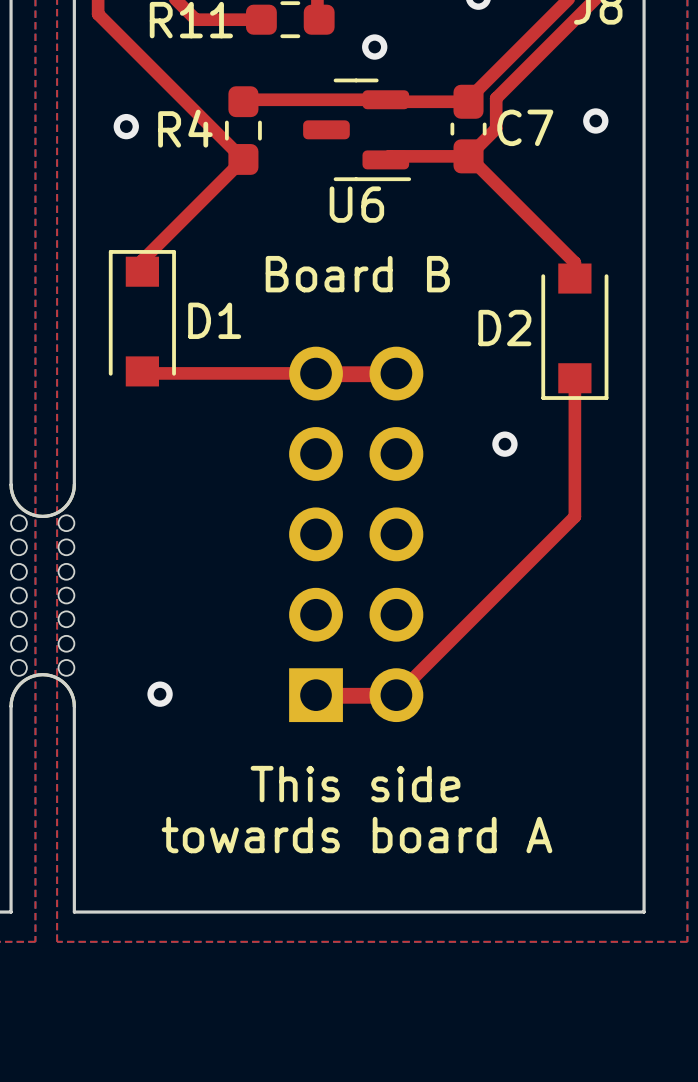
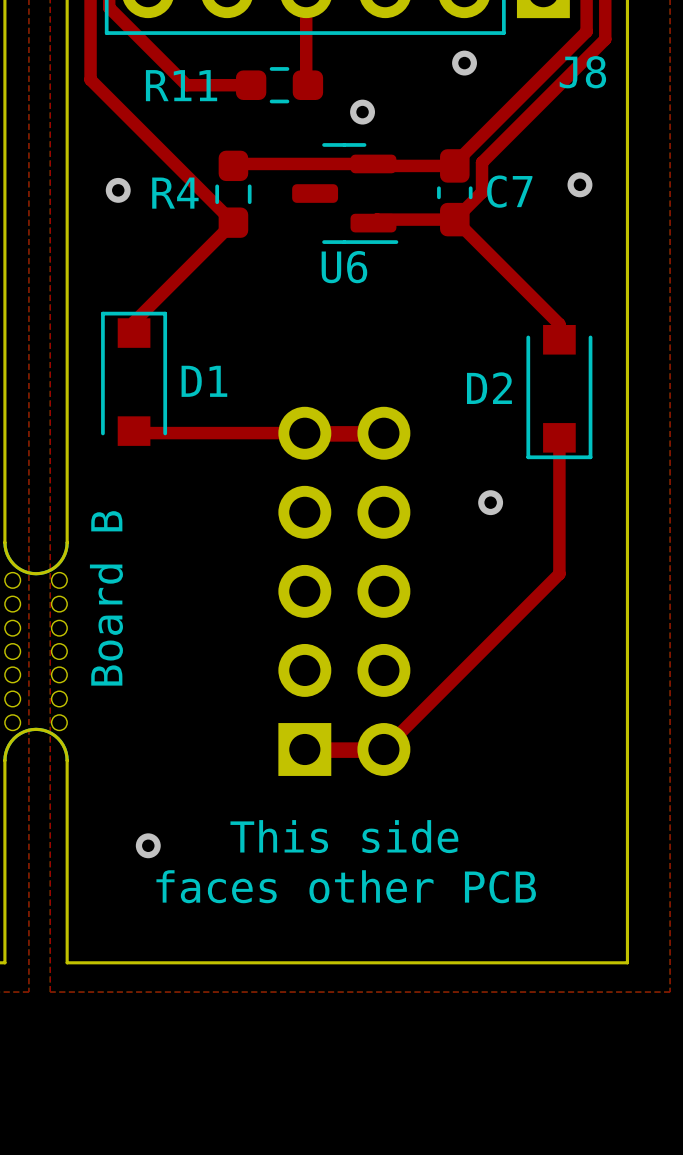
text rotation: 0° (357, 274) -> 90° counterclockwise (106, 598)
text position: Board B (357, 274) -> Board B (106, 598)
via position: (160, 694) -> (148, 845)
text: towards board A (357, 835) -> faces other PCB (346, 886)

